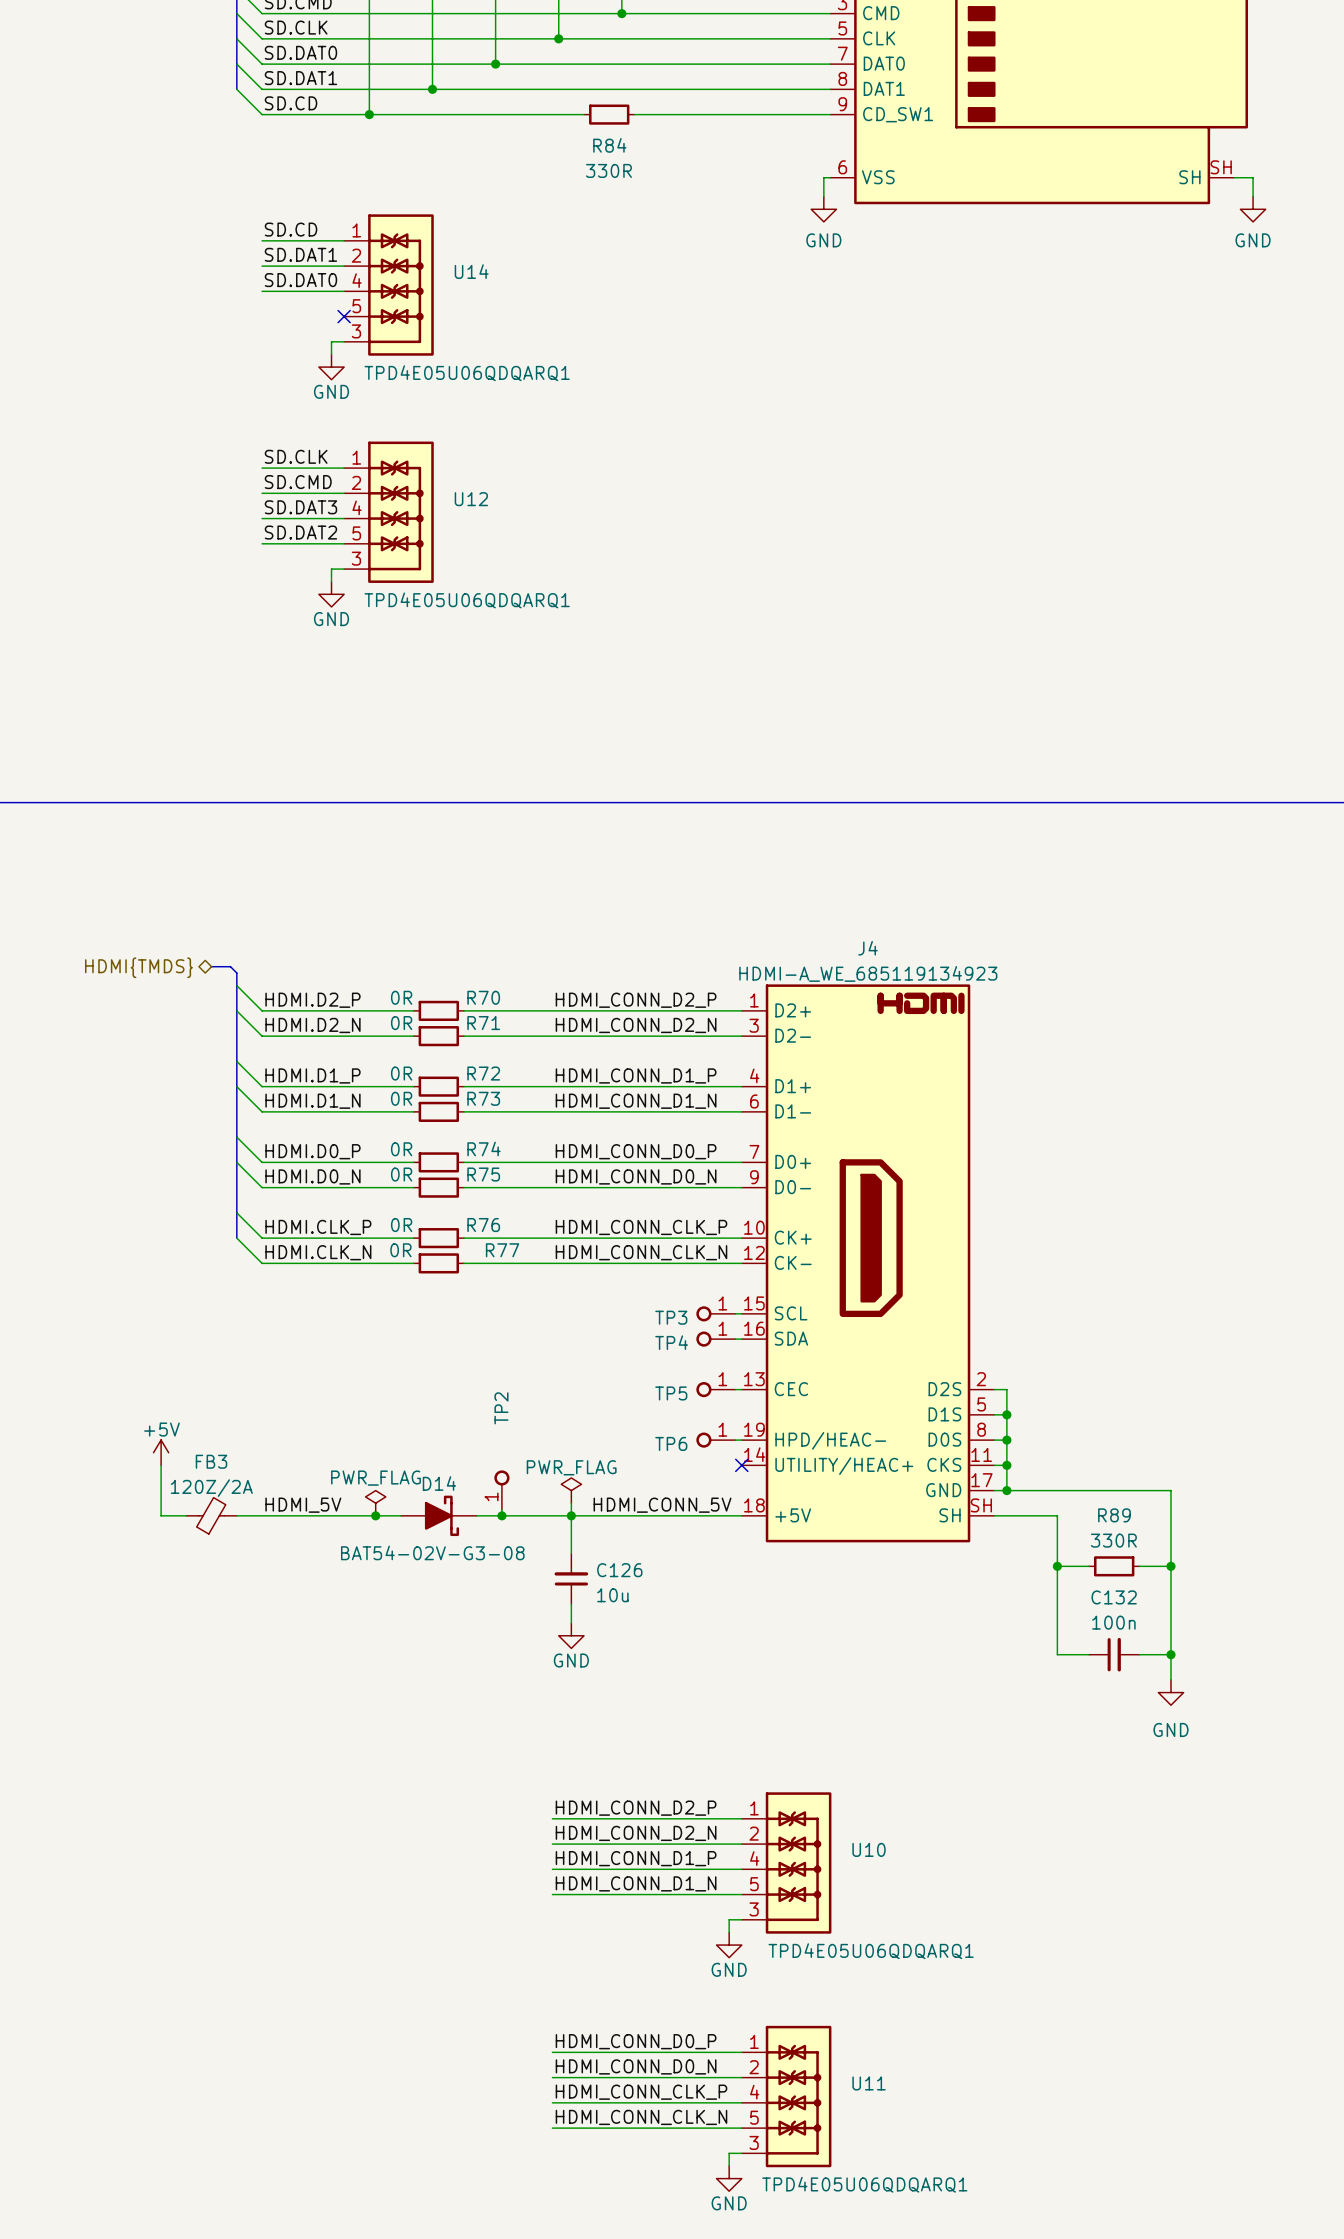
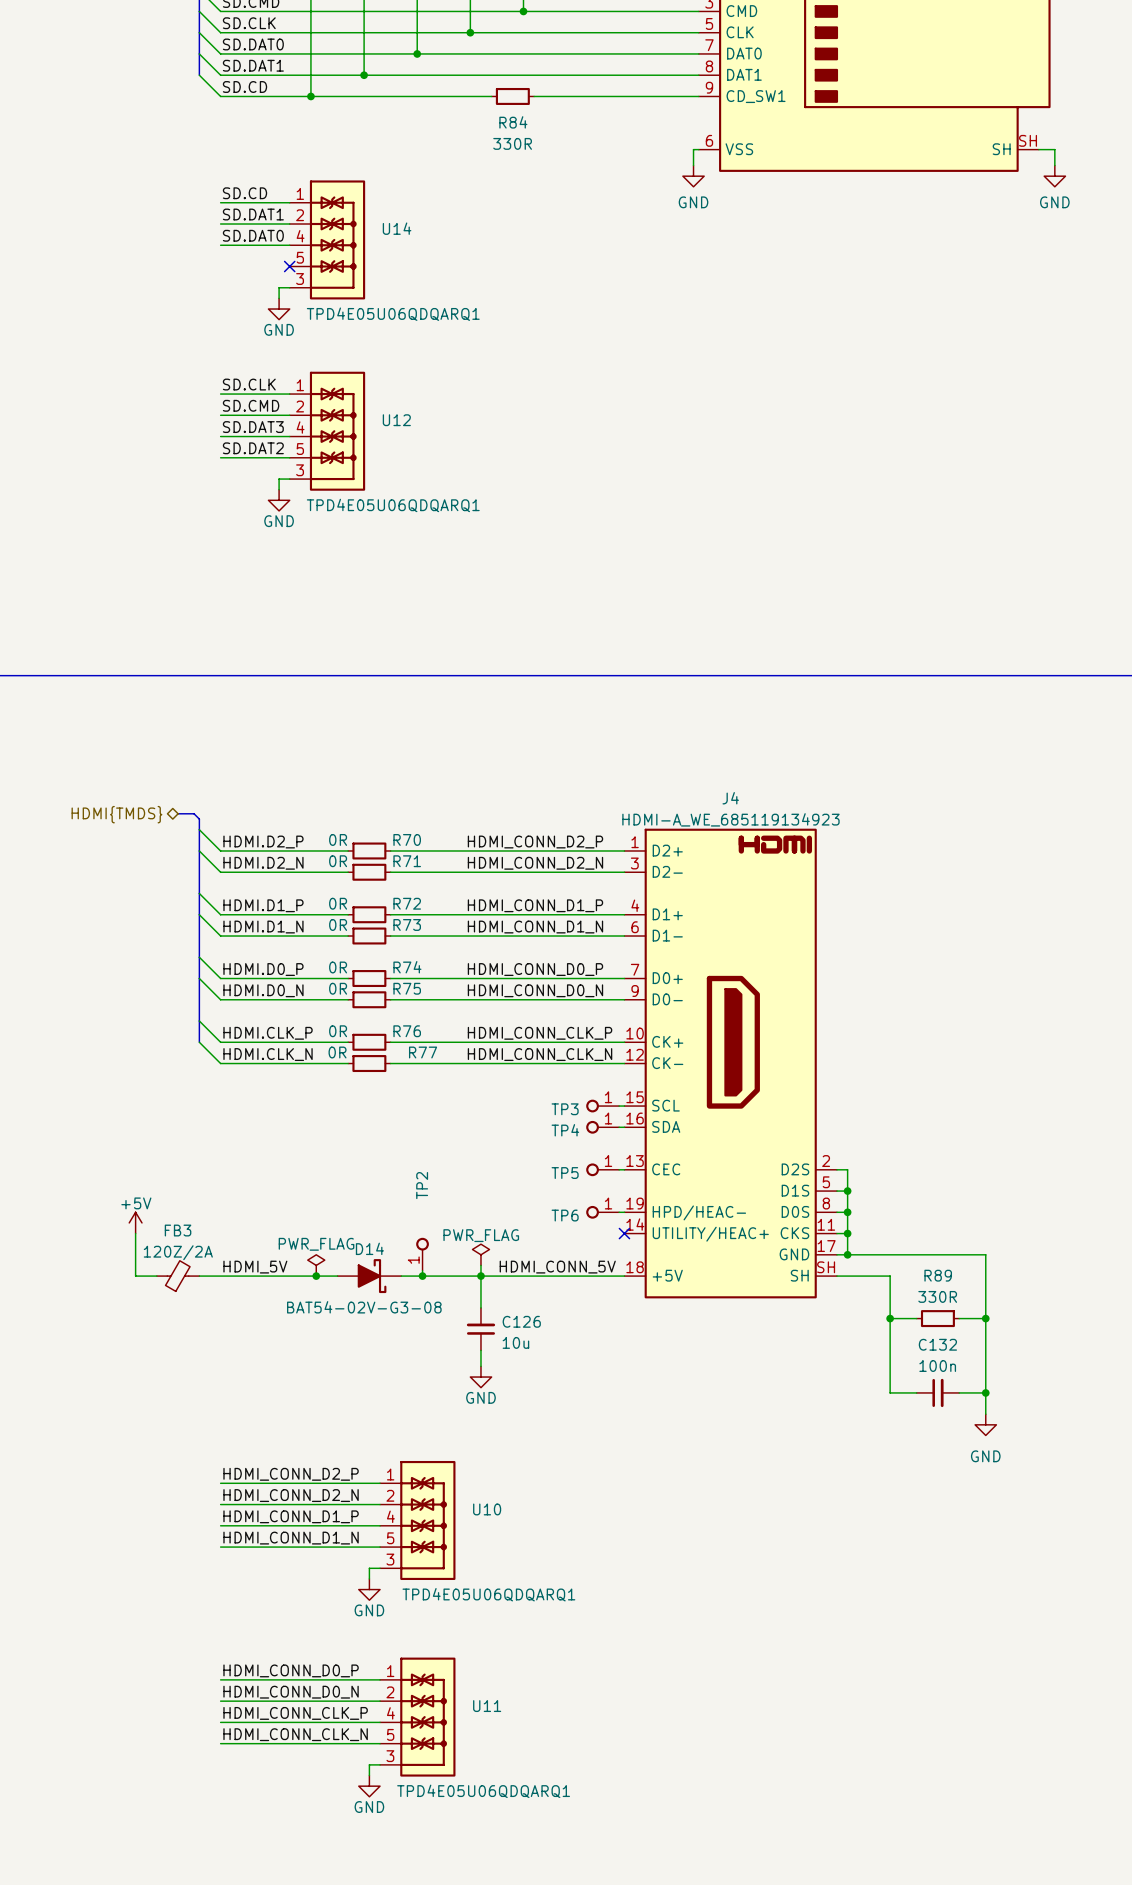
label: none -> HDMI_CONN_D2_P (291, 1474)
wire: none -> (220, 1483) (380, 1483)
label: none -> HDMI_CONN_D2_N (291, 1495)
wire: none -> (220, 1504) (380, 1504)
label: none -> HDMI_CONN_D1_P (291, 1516)
label: HDMI_CONN_D2_P (636, 1808) -> none
wire: none -> (220, 1525) (380, 1525)
wire: (552, 1818) (741, 1818) -> none
label: none -> HDMI_CONN_D1_N (291, 1538)
label: HDMI_CONN_D2_N (636, 1833) -> none
wire: none -> (220, 1547) (380, 1547)
wire: (552, 1844) (741, 1844) -> none
label: HDMI_CONN_D1_P (636, 1858) -> none
wire: none -> (380, 1568) (369, 1568) (369, 1578)
U10 position: (786, 1863) -> (417, 1520)
wire: (552, 1869) (741, 1869) -> none
label: HDMI_CONN_D1_N (636, 1883) -> none
power symbol: none -> GND (369, 1589)
wire: (552, 1894) (741, 1894) -> none
wire: (741, 1919) (729, 1919) (729, 1932) -> none
power symbol: GND (729, 1945) -> none
label: none -> HDMI_CONN_D0_P (291, 1670)
wire: none -> (220, 1679) (380, 1679)
label: none -> HDMI_CONN_D0_N (291, 1692)
wire: none -> (220, 1701) (380, 1701)
label: none -> HDMI_CONN_CLK_P (295, 1713)
label: HDMI_CONN_D0_P (636, 2041) -> none
wire: none -> (220, 1722) (380, 1722)
wire: (552, 2052) (741, 2052) -> none
label: none -> HDMI_CONN_CLK_N (295, 1734)
label: HDMI_CONN_D0_N (636, 2066) -> none
wire: none -> (220, 1743) (380, 1743)
wire: (552, 2077) (741, 2077) -> none
label: HDMI_CONN_CLK_P (641, 2092) -> none
wire: none -> (380, 1764) (369, 1764) (369, 1775)
U11 position: (786, 2096) -> (417, 1717)
wire: (552, 2102) (741, 2102) -> none
label: HDMI_CONN_CLK_N (641, 2117) -> none
power symbol: none -> GND (369, 1786)
wire: (552, 2128) (741, 2128) -> none
wire: (741, 2153) (729, 2153) (729, 2165) -> none
power symbol: GND (729, 2178) -> none

